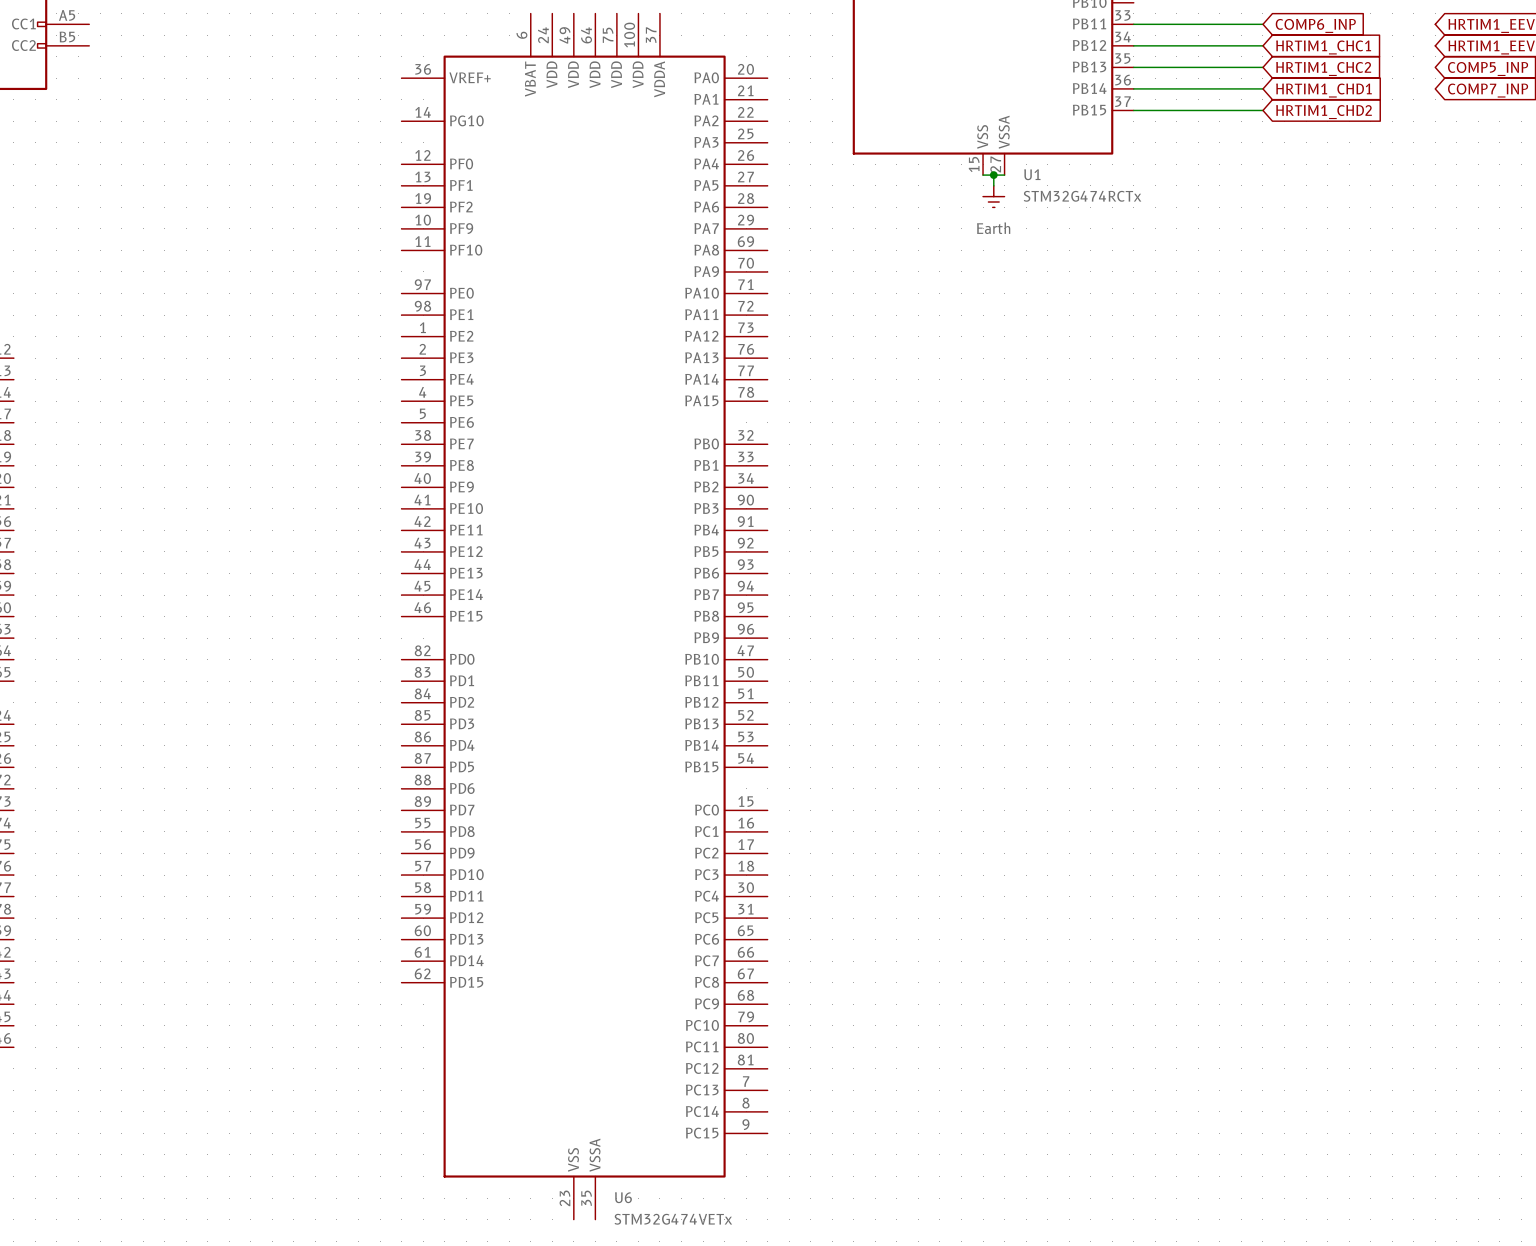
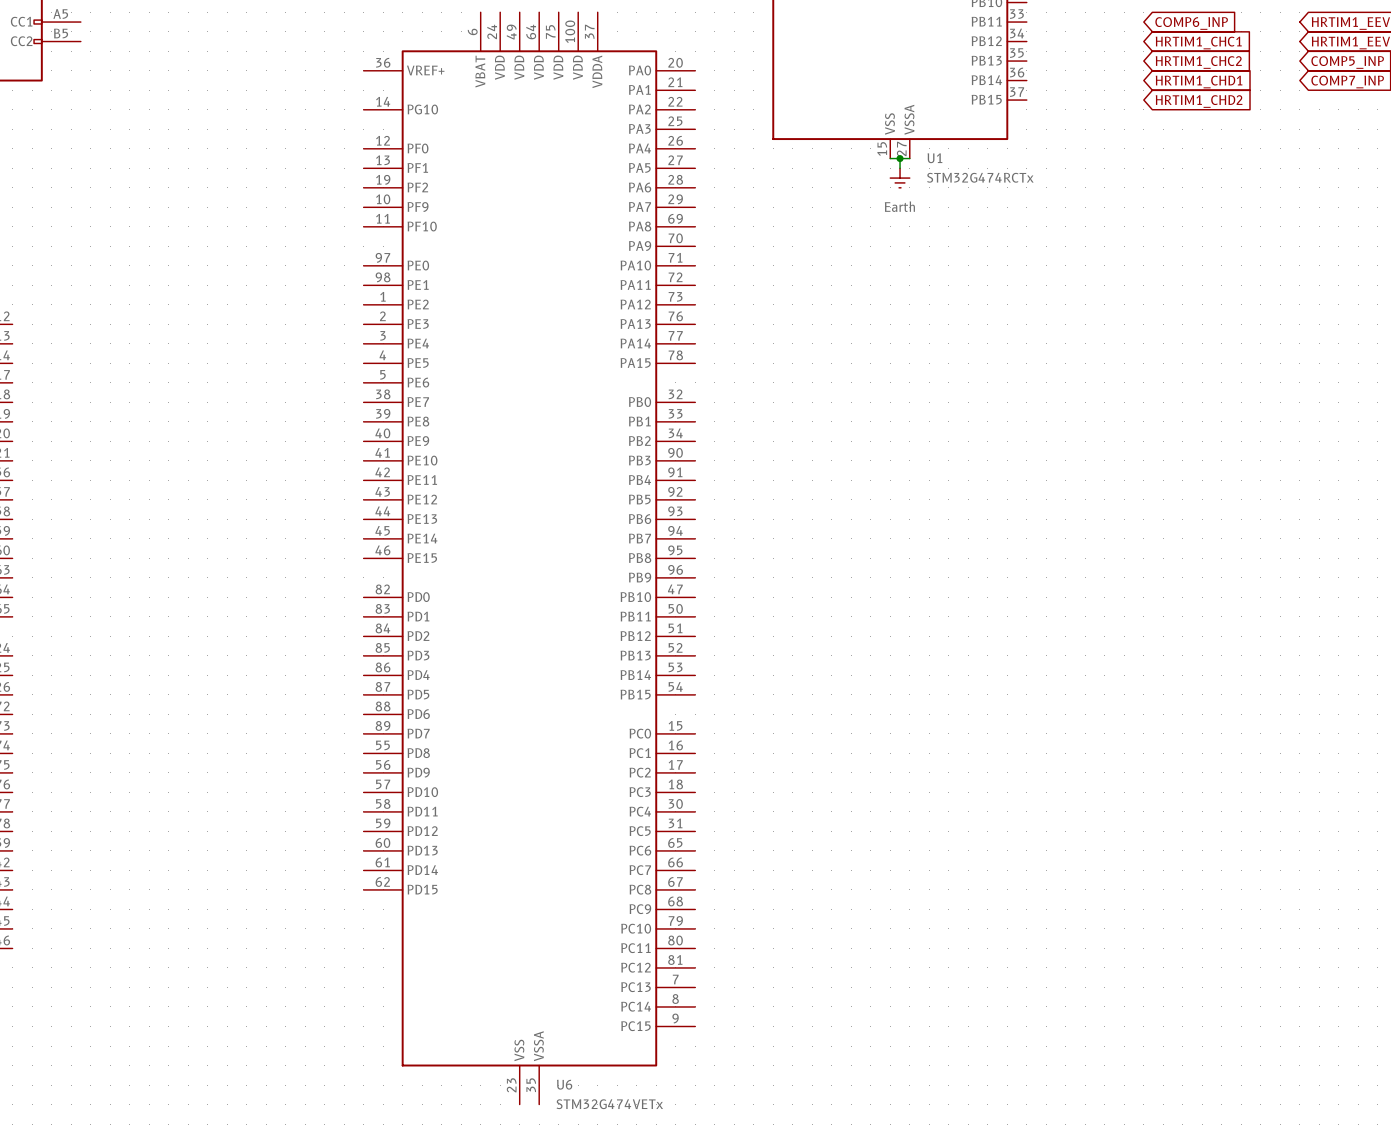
wire: (1133, 24) (1262, 24) -> none
wire: (1133, 45) (1262, 45) -> none
wire: (1133, 67) (1262, 67) -> none
wire: (1133, 88) (1262, 88) -> none
wire: (1133, 110) (1262, 110) -> none

